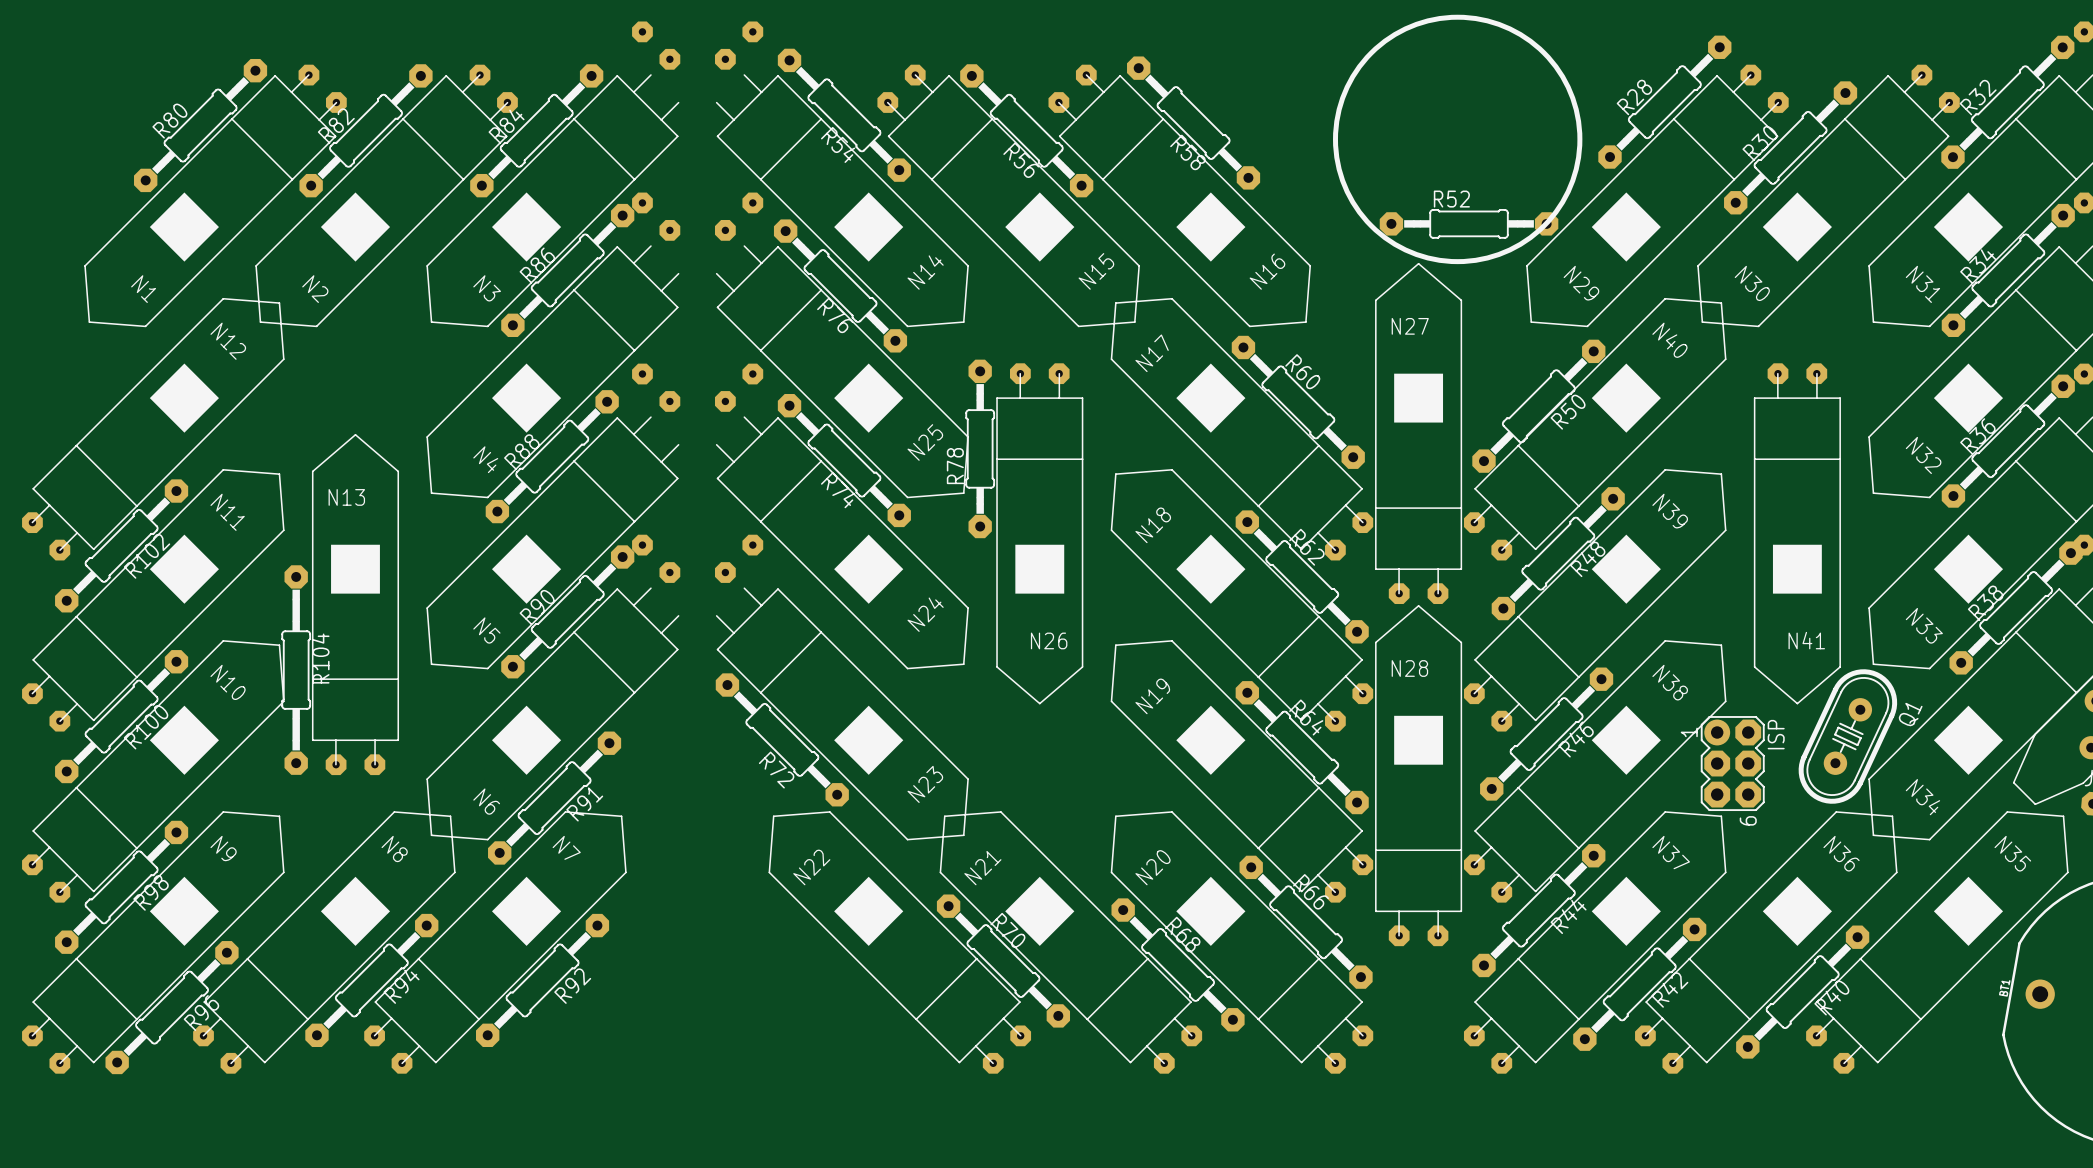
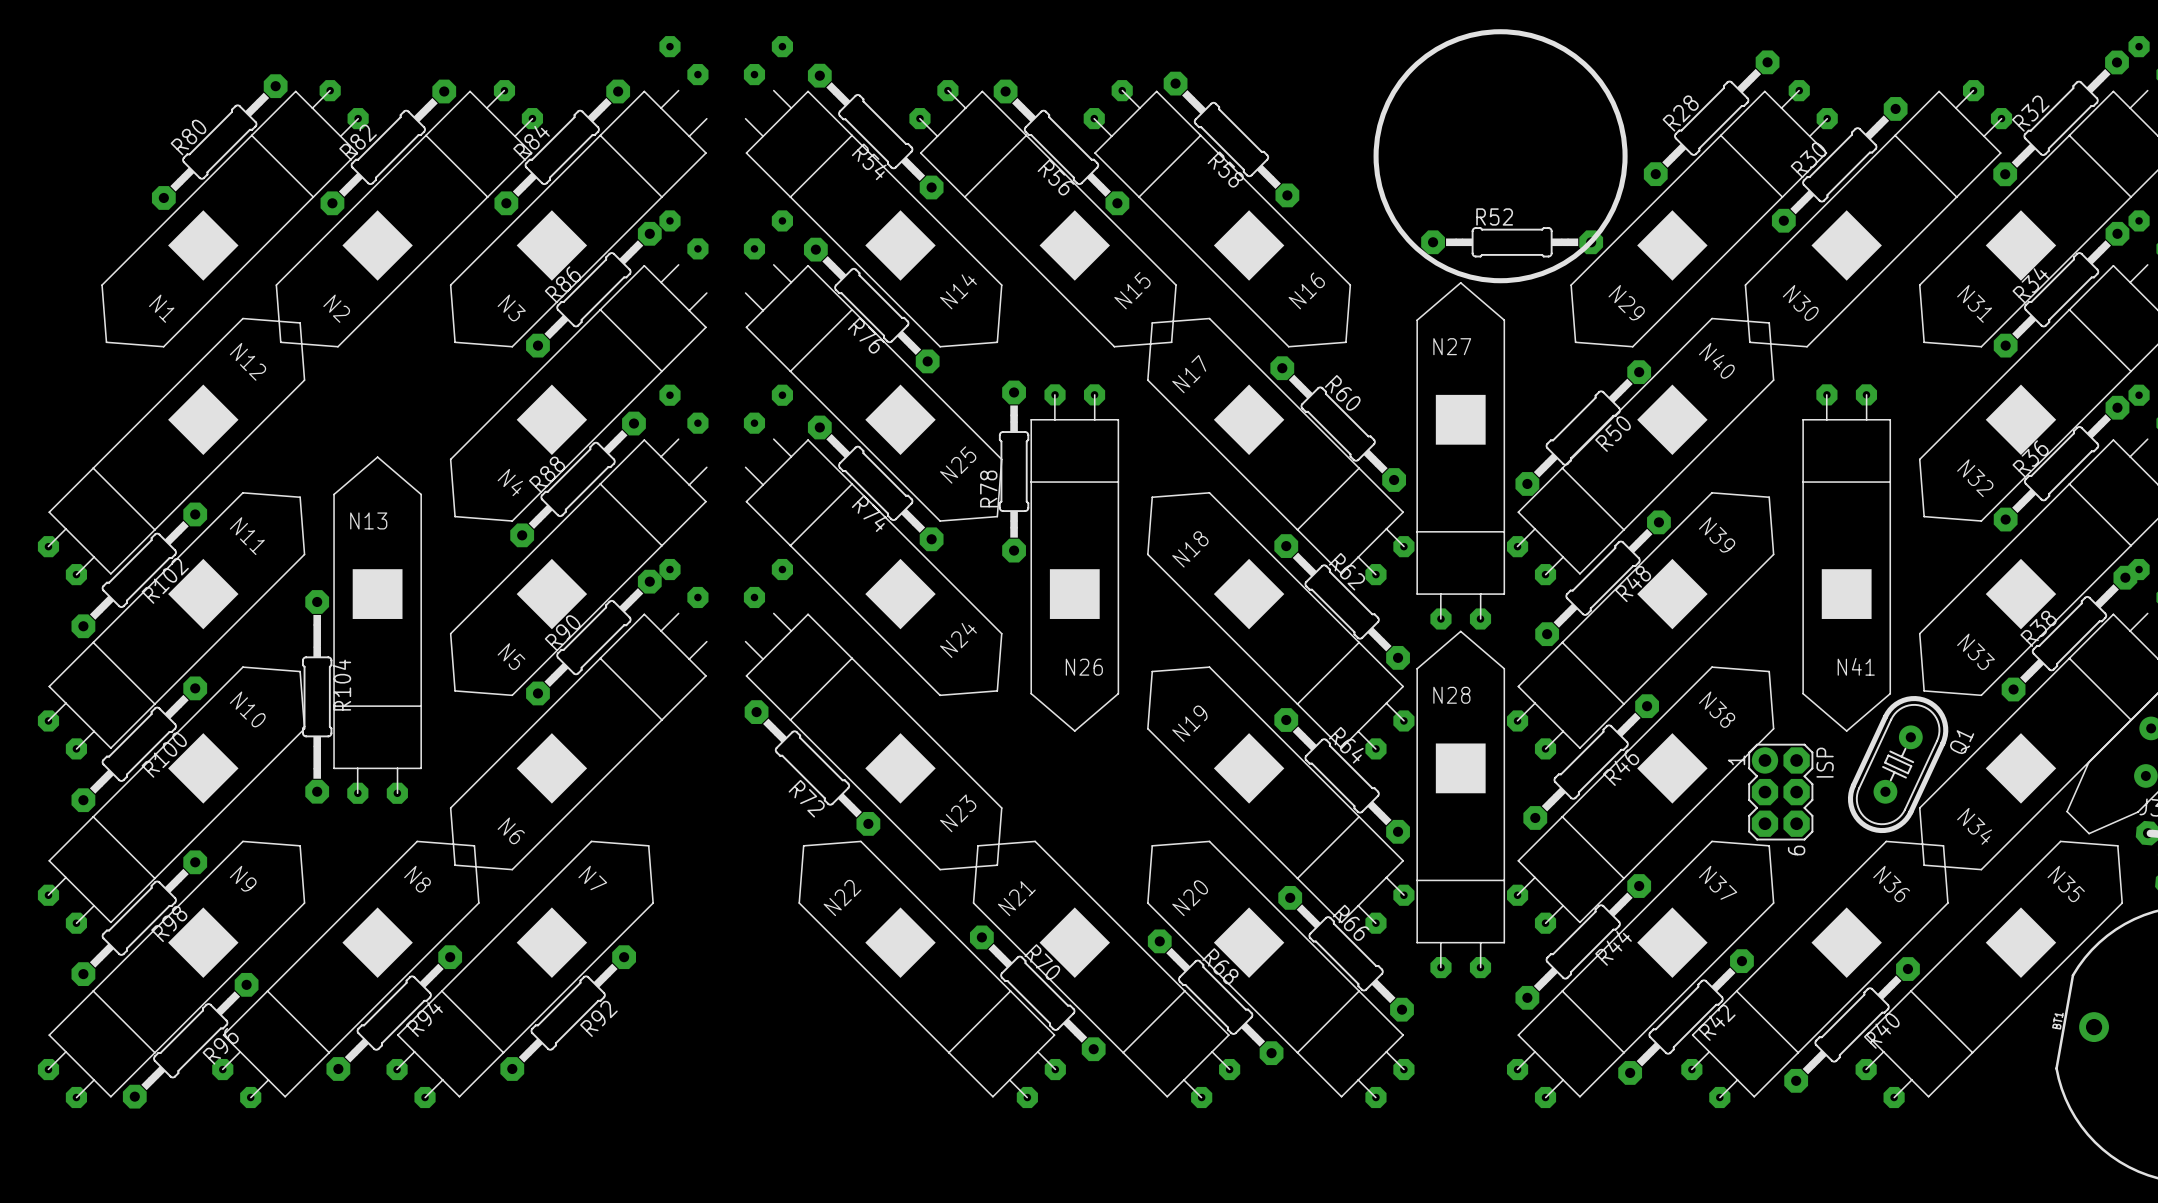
R91: (554, 798) -> none

